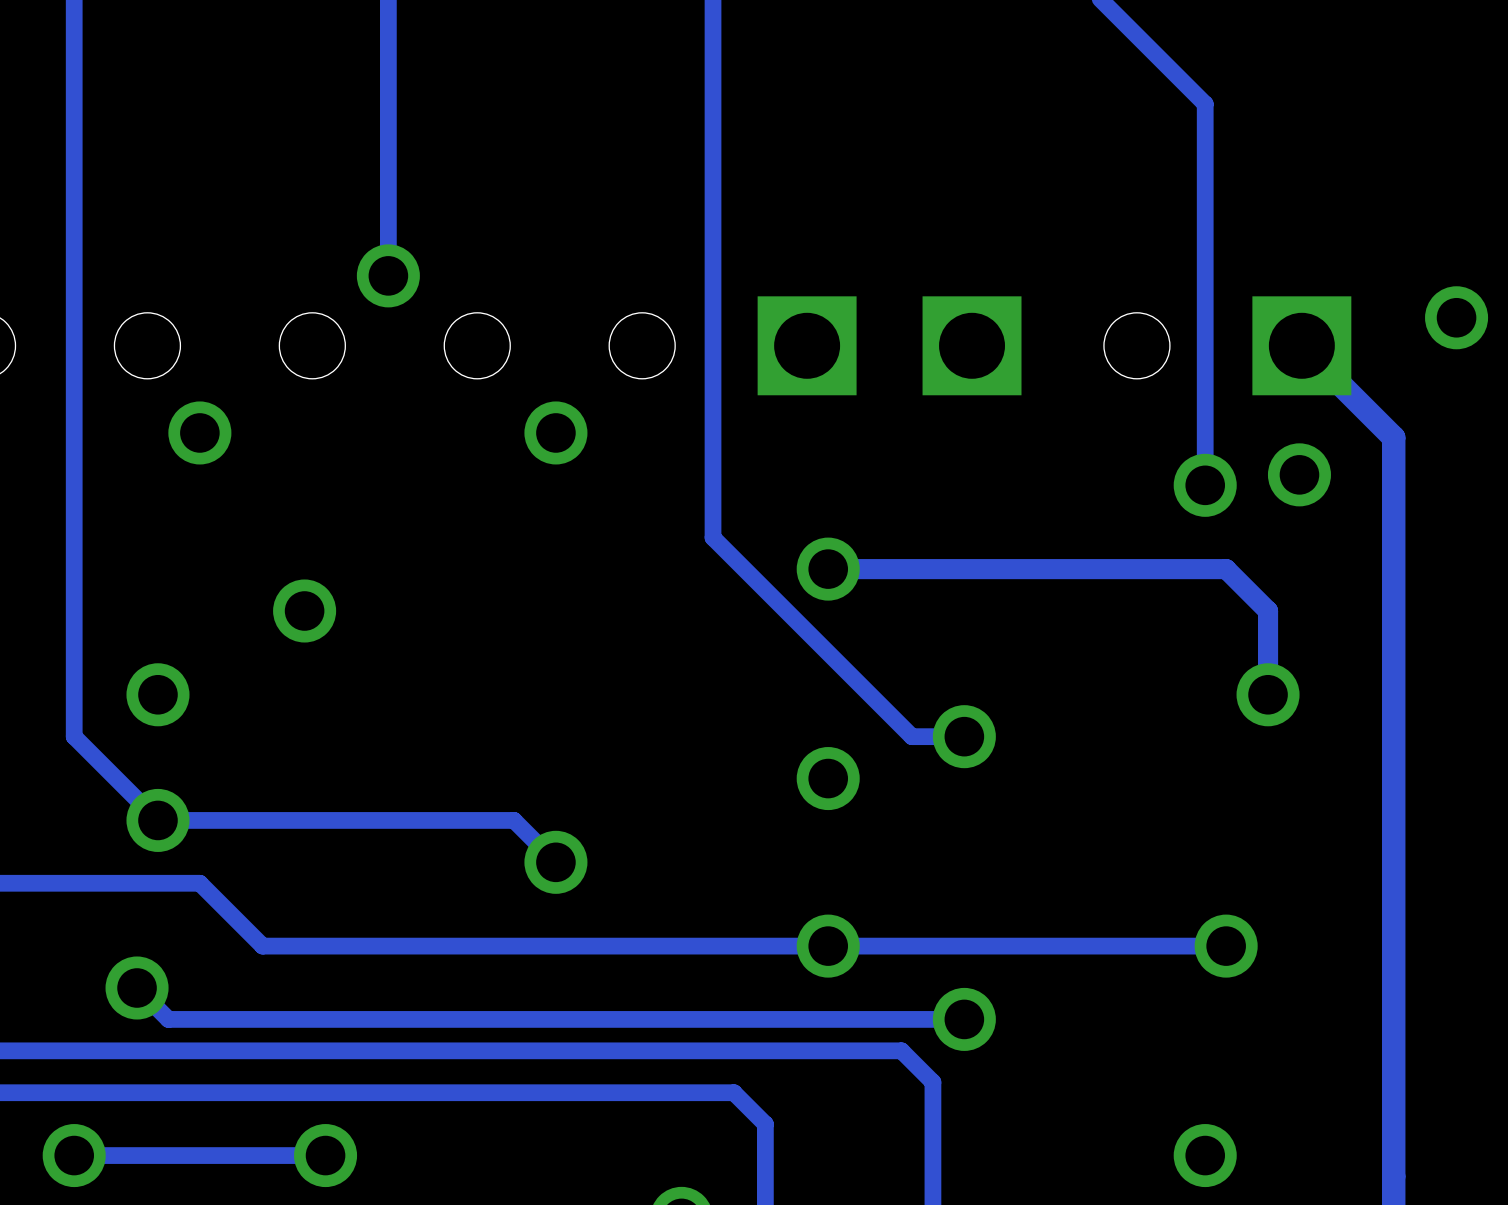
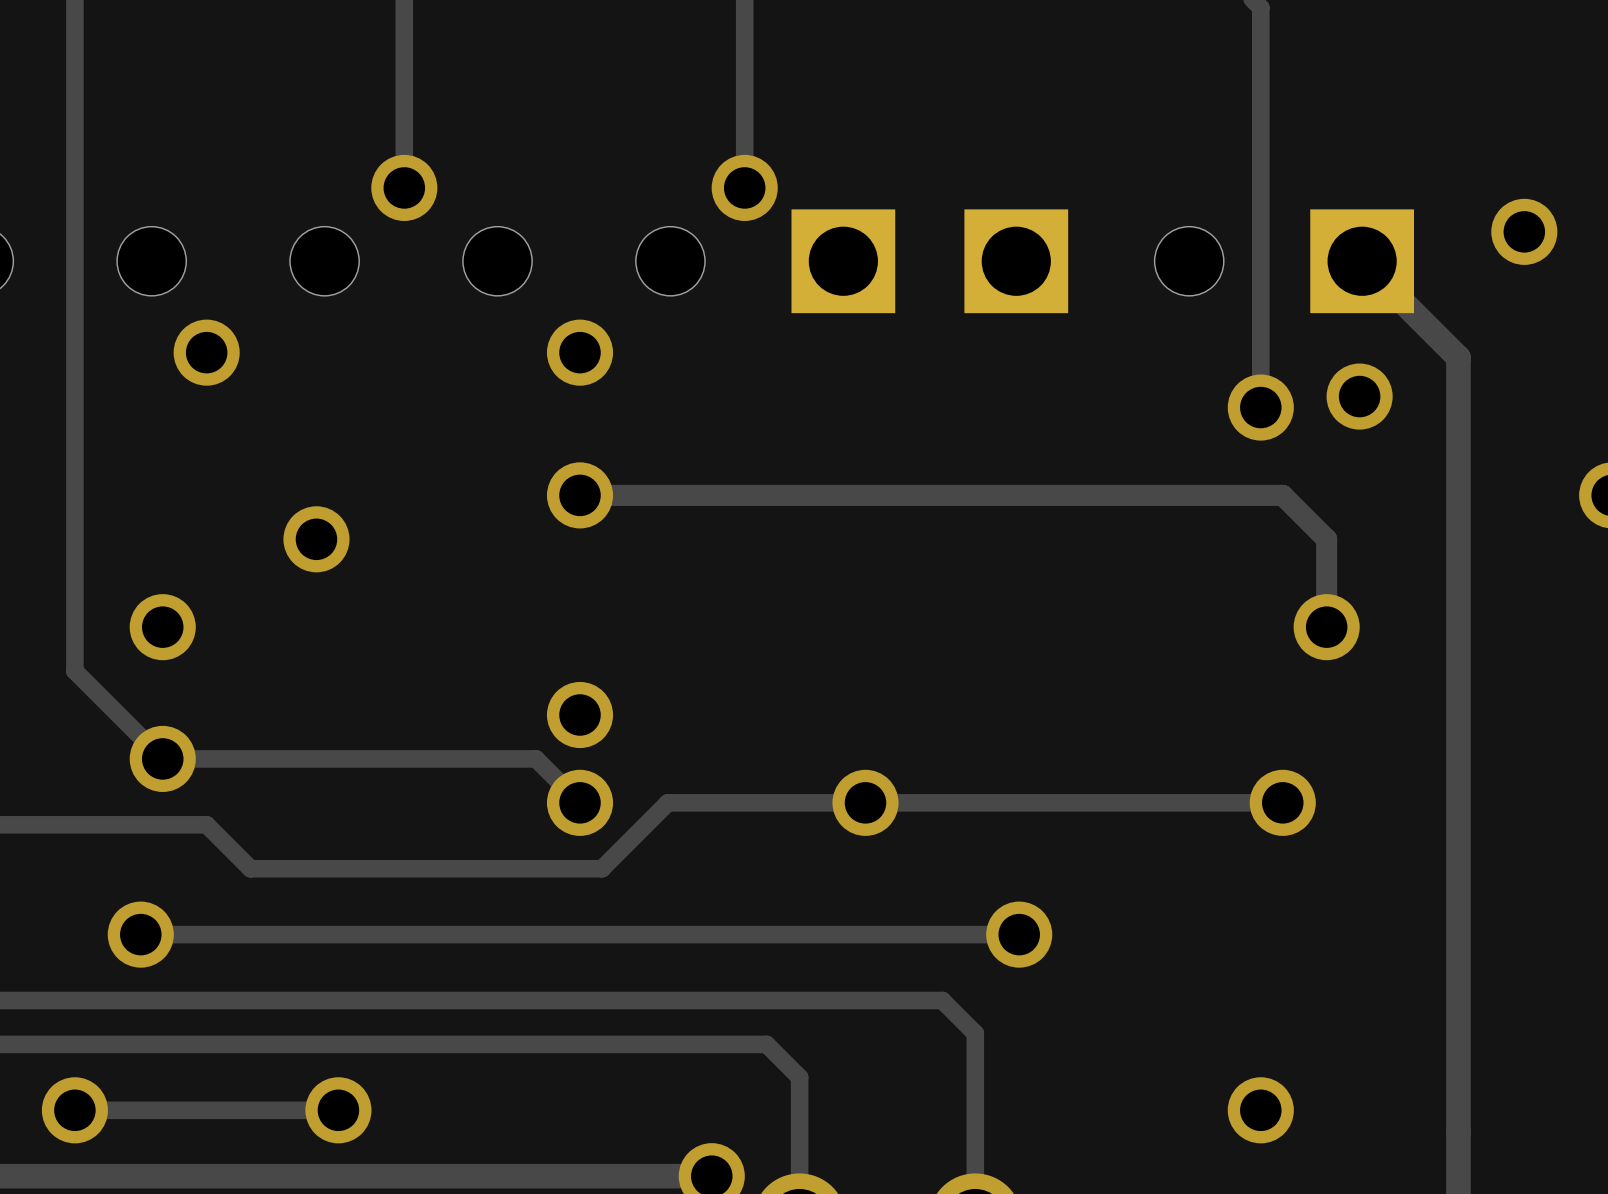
track: (713, 275) (713, 537) (911, 736) (964, 736) -> none
via: none -> (744, 187)
via: none -> (580, 495)
track: none -> (865, 495) (580, 495)
via: (828, 569) -> none
via: (964, 736) -> none
via: none -> (580, 715)
via: (828, 778) -> none
via: none -> (865, 802)
track: (241, 925) (262, 946) (1226, 946) -> (250, 868) (601, 868) (667, 802) (1282, 802)
via: (828, 946) -> none
via position: (1226, 946) -> (1282, 802)
track: (137, 987) (168, 1019) (964, 1019) -> (140, 934) (1019, 934)
via position: (964, 1019) -> (1019, 934)

